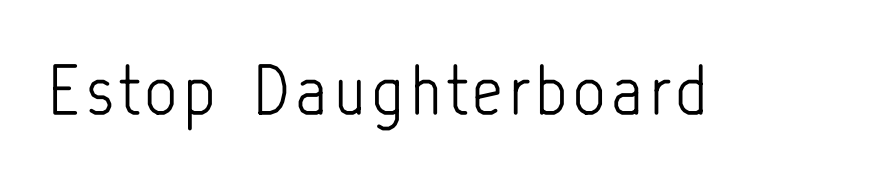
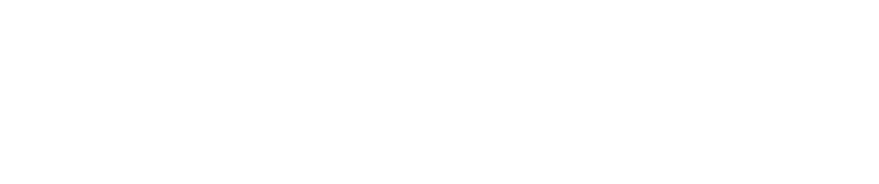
text: Estop Daughterboard (377, 97) -> none

